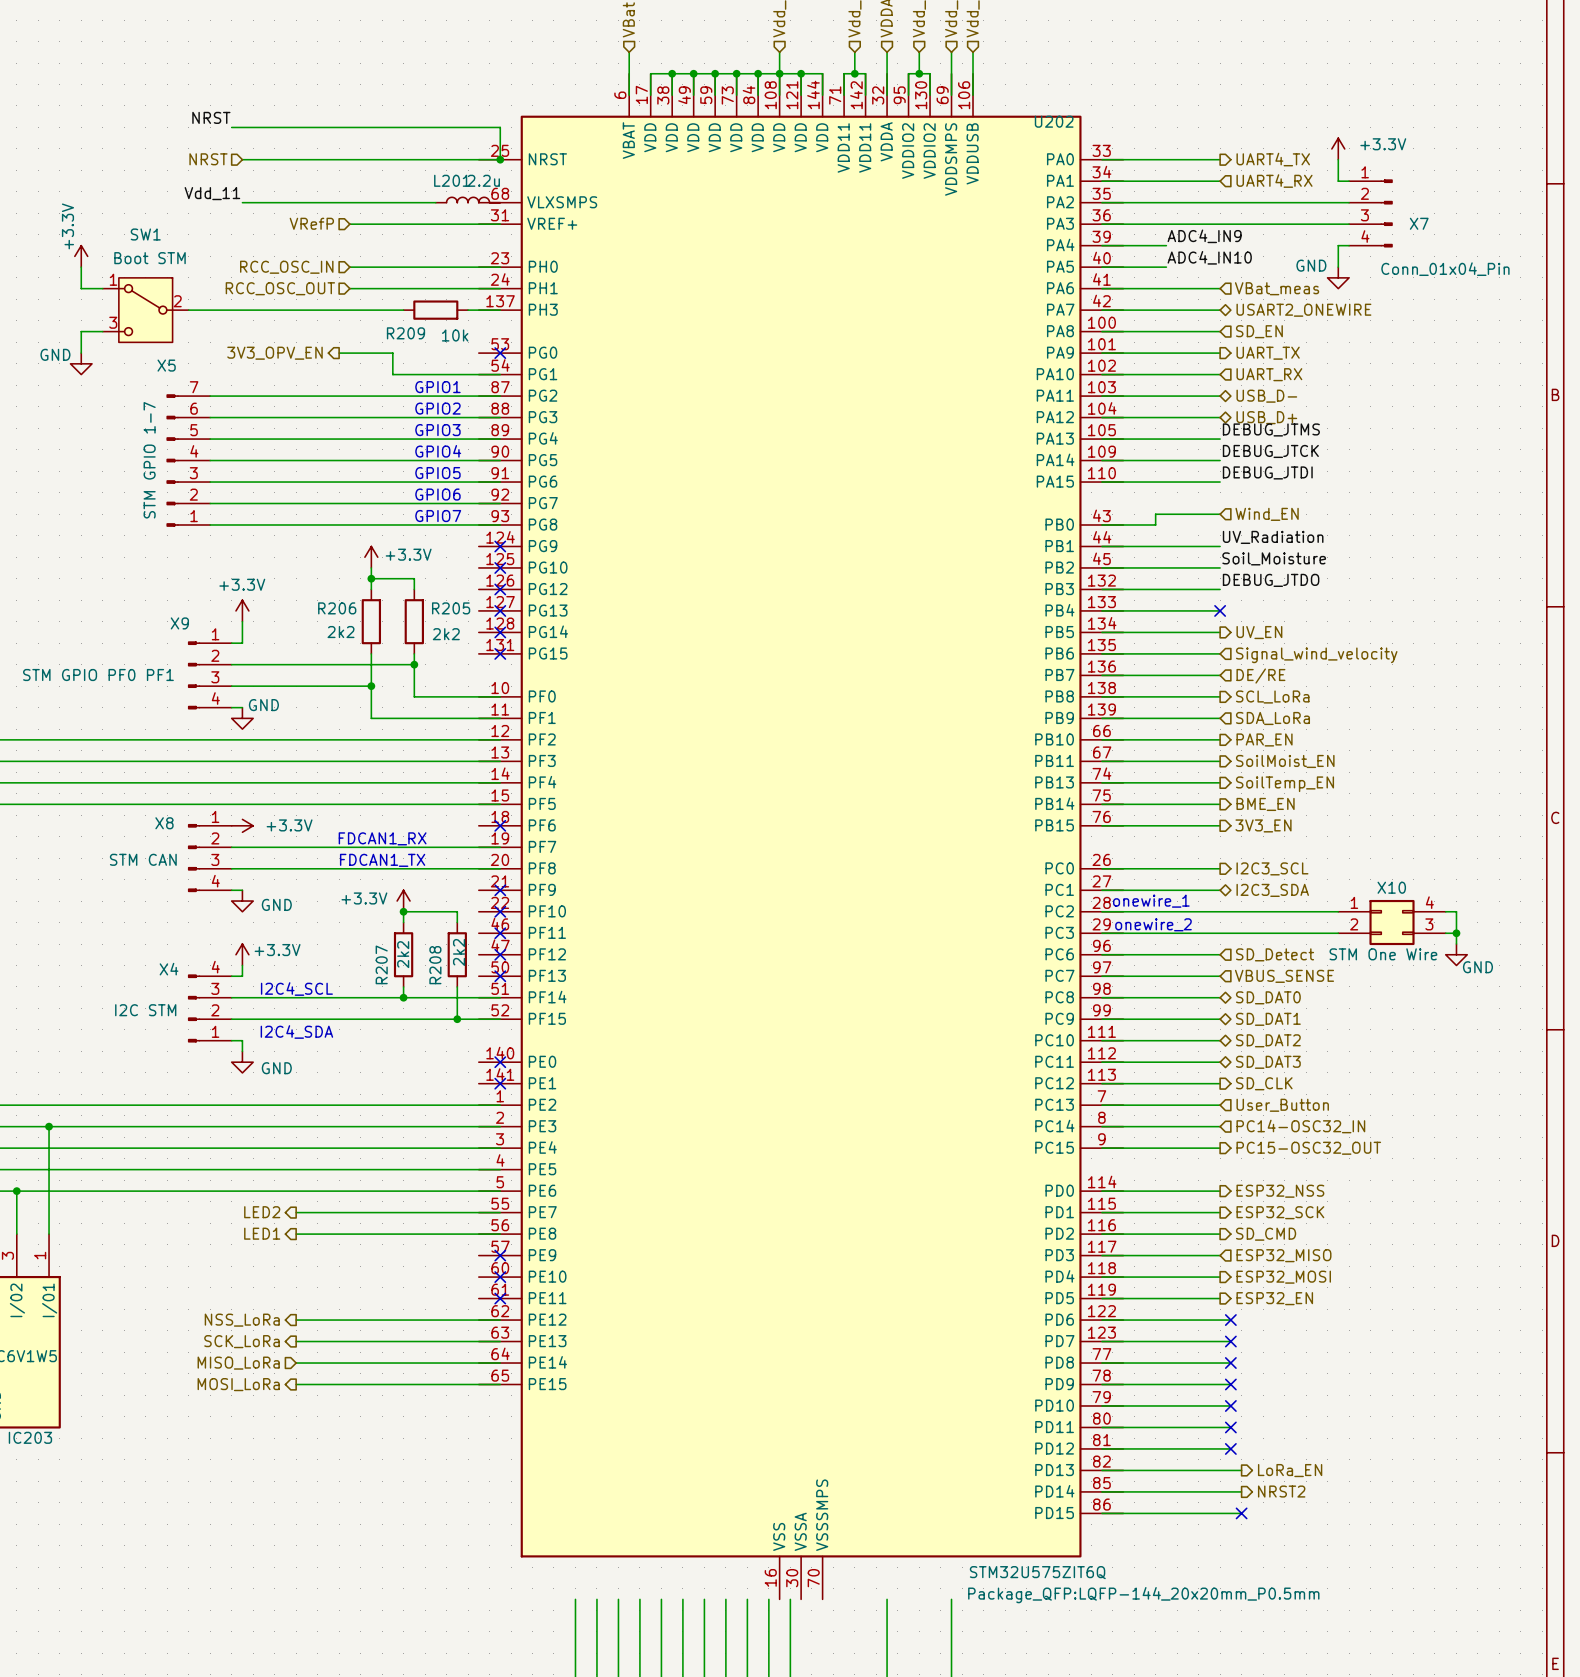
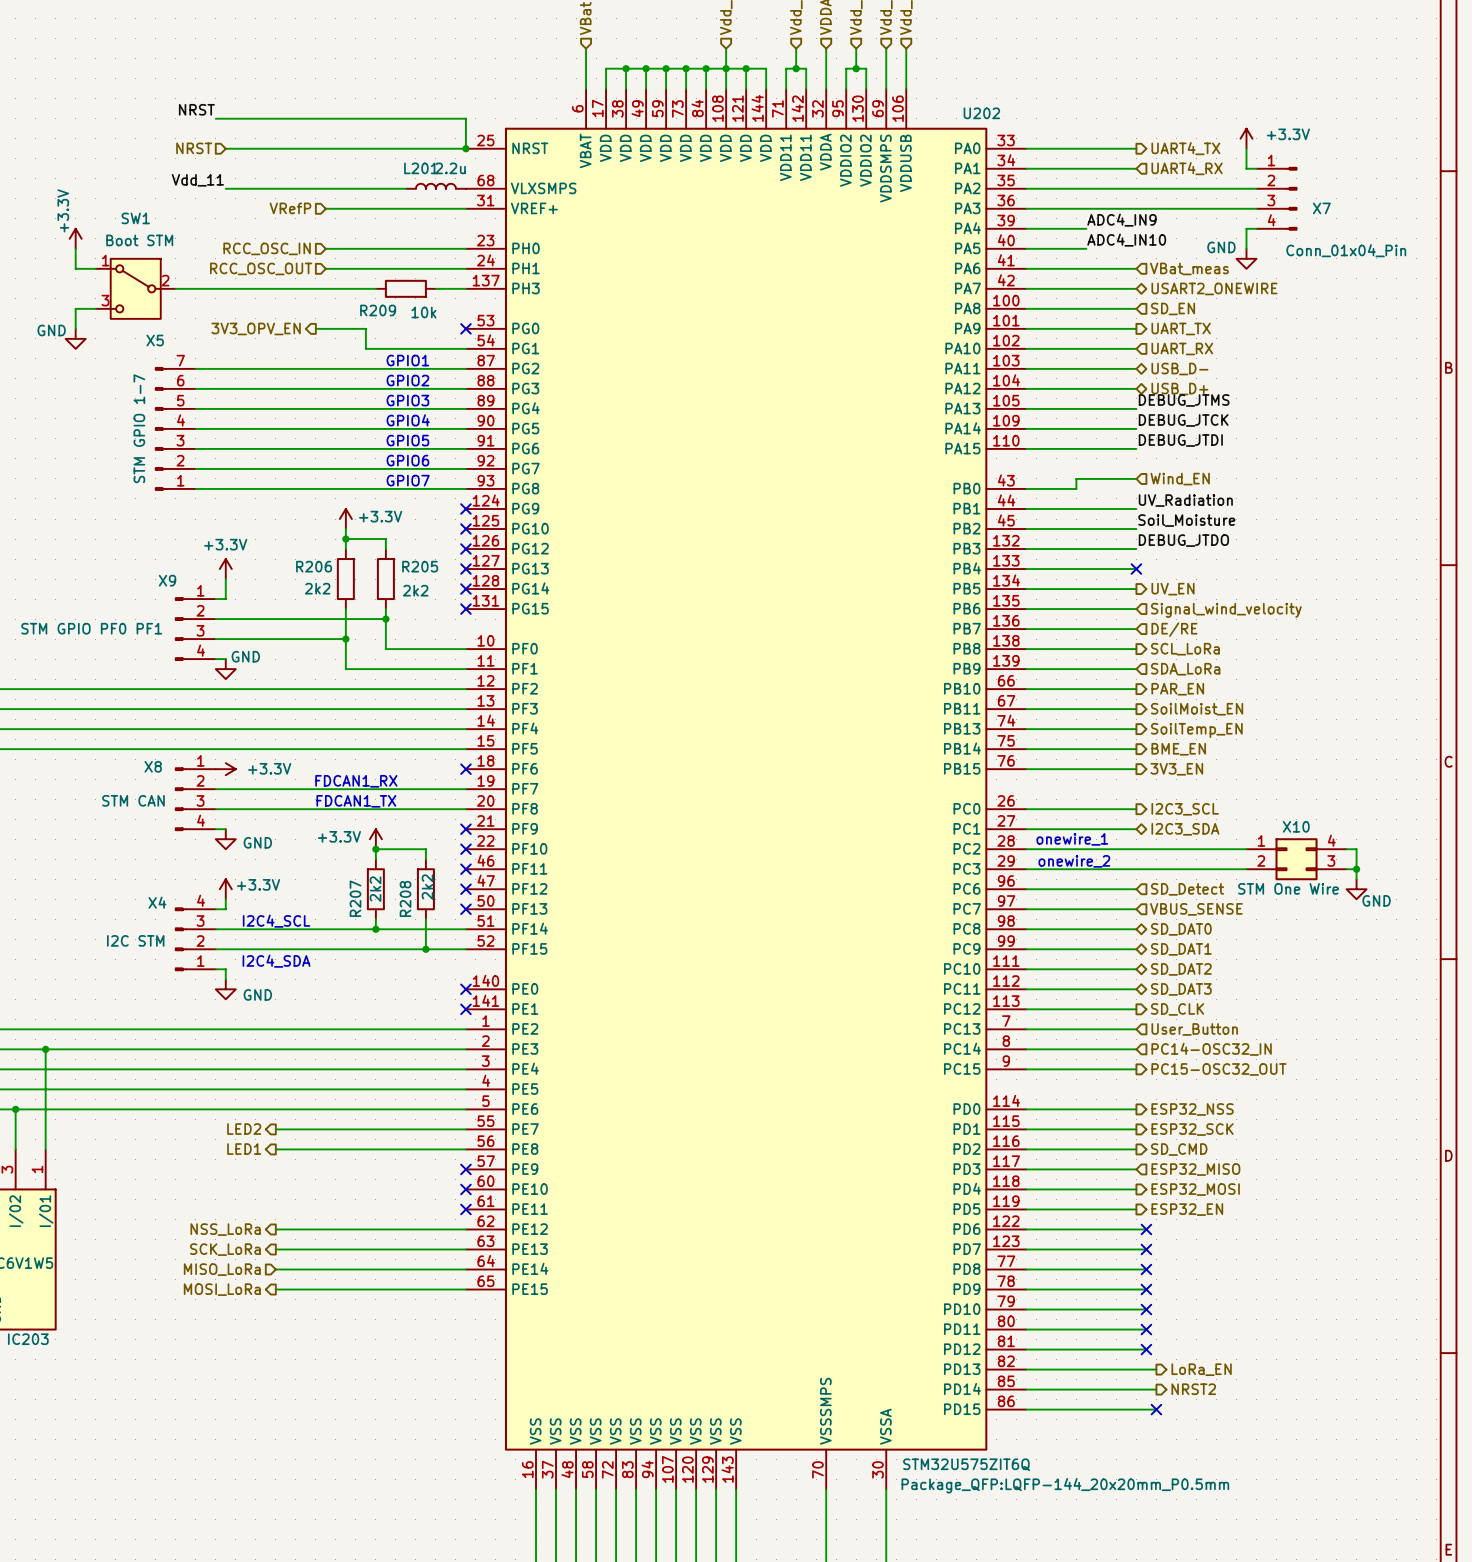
U202 symbol: [478, 73, 1124, 1600] -> [465, 88, 1027, 1490]

